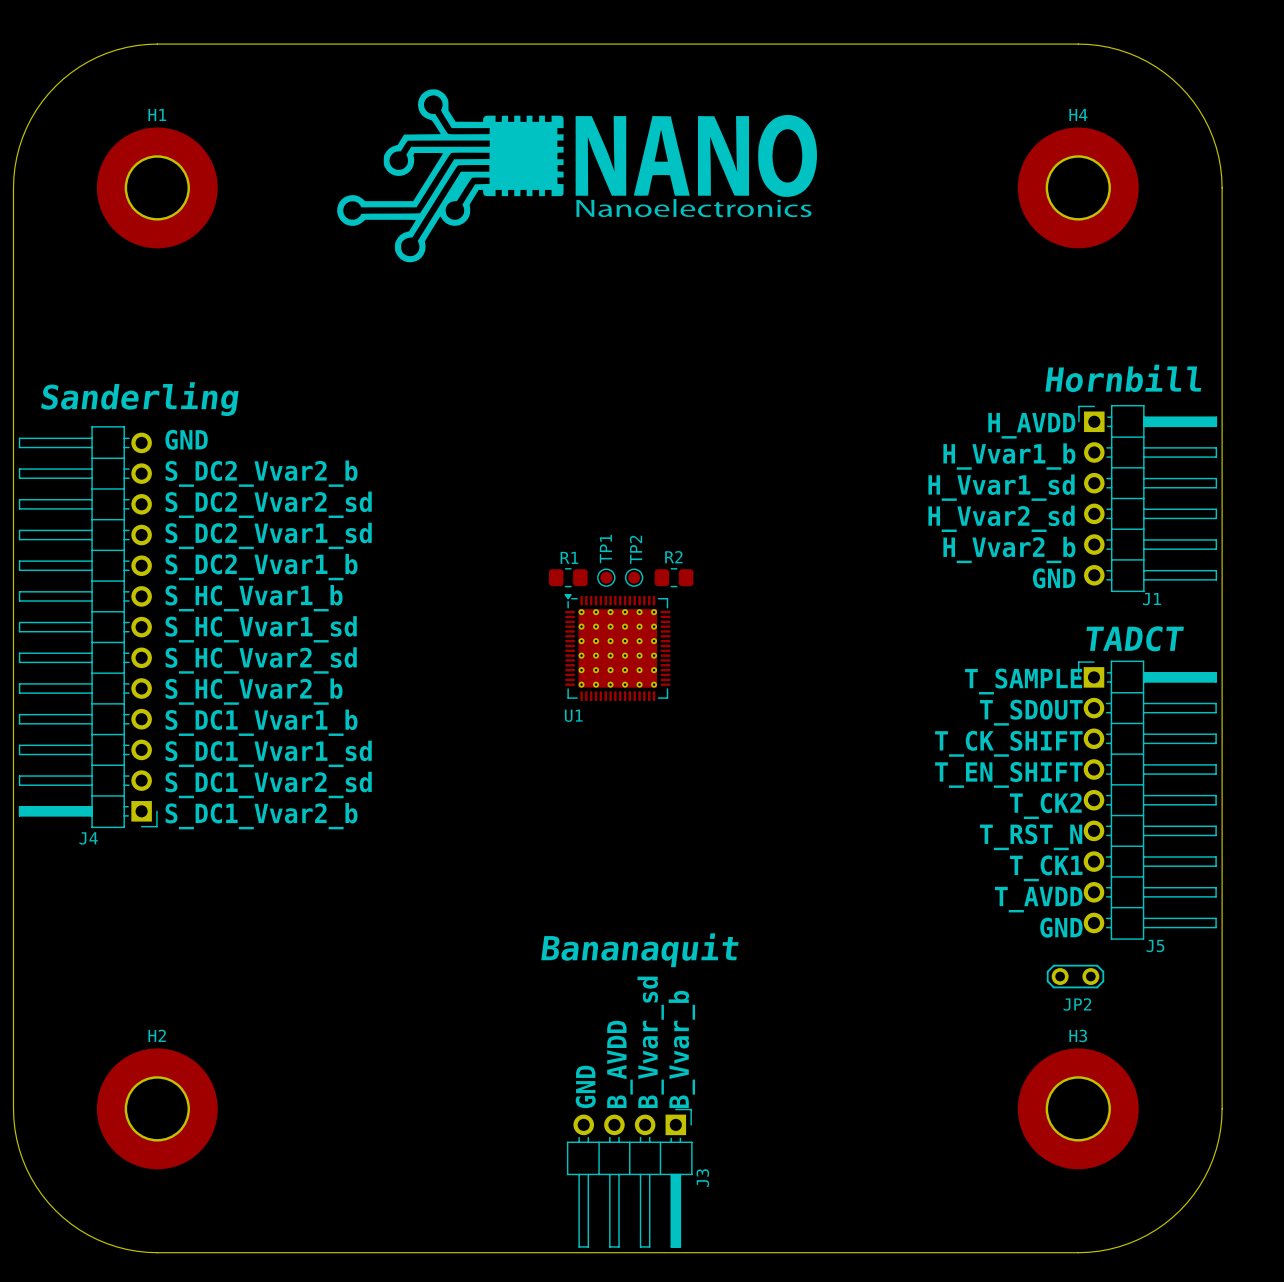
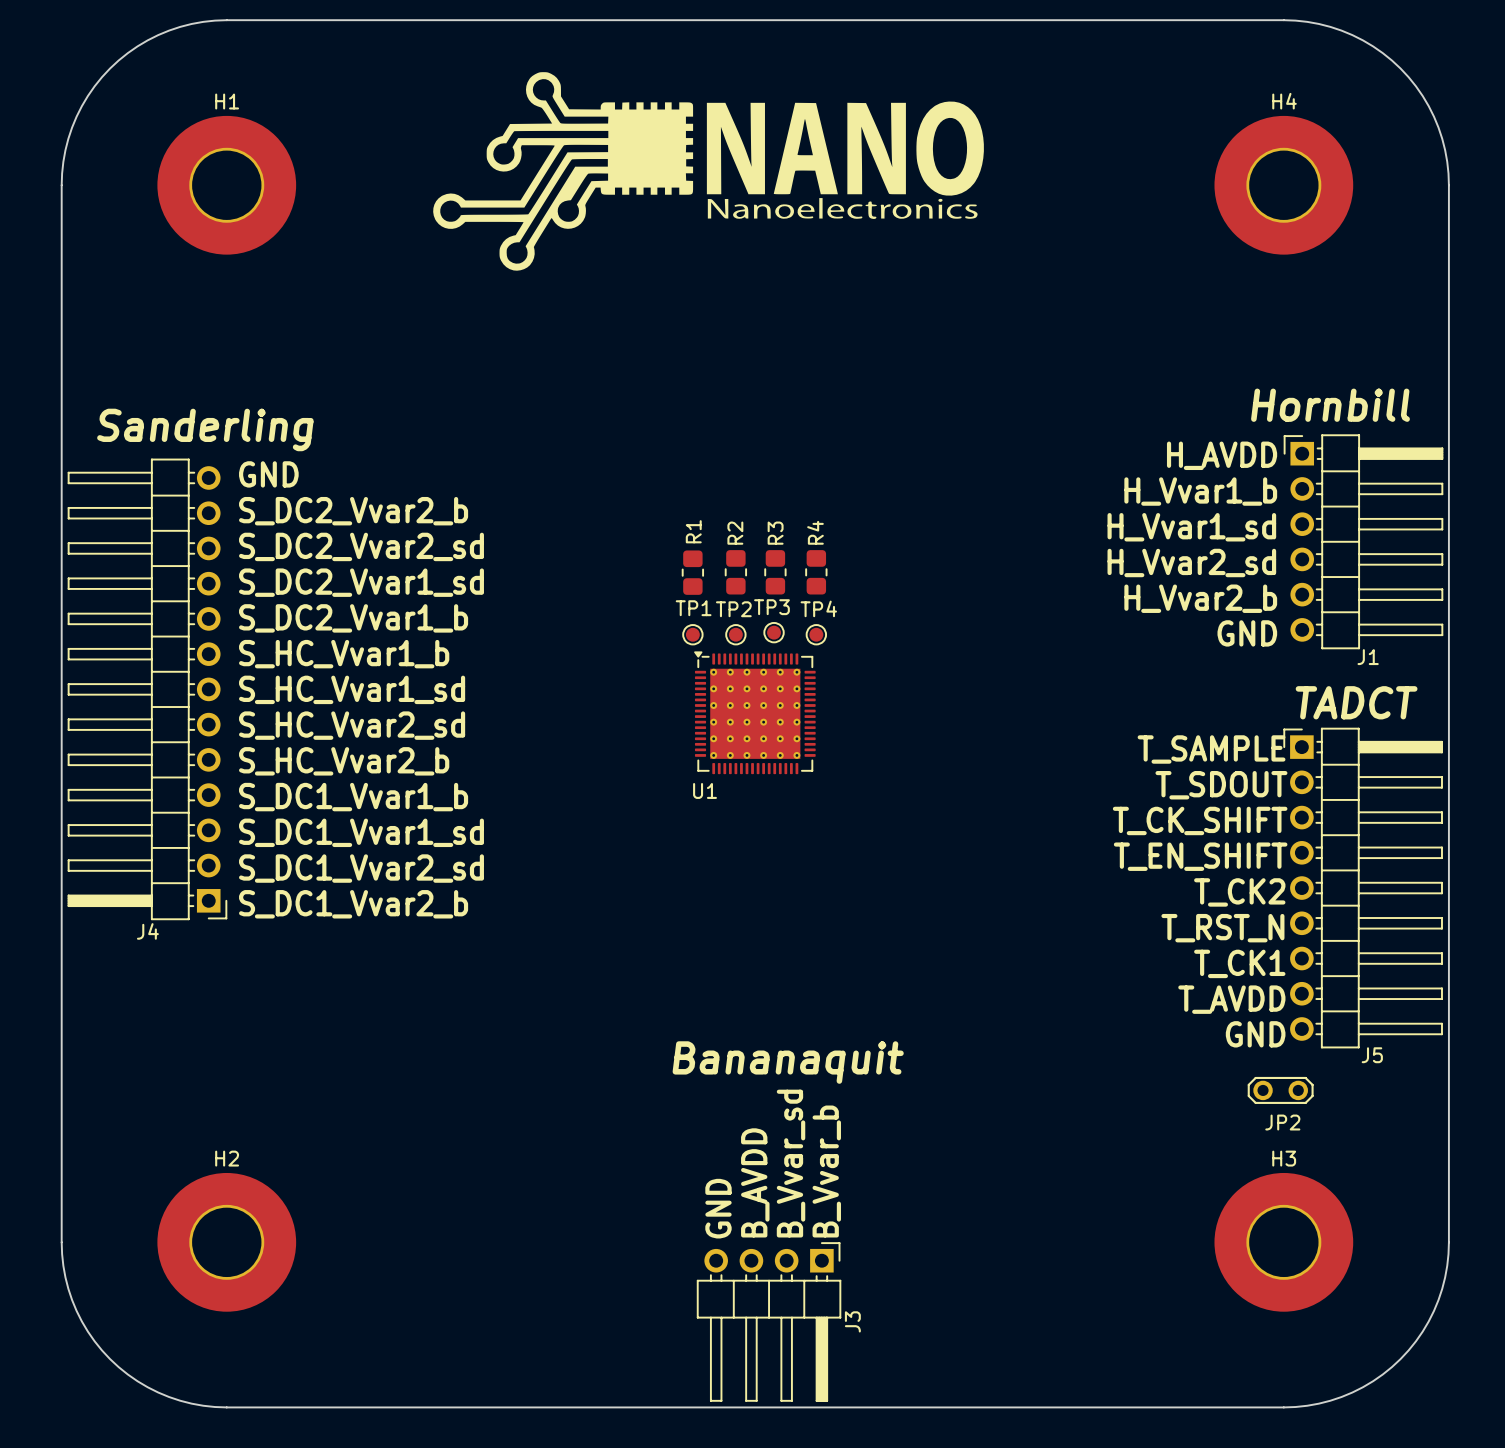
R3: none -> (775, 572)
R4: none -> (816, 572)
TP1 name rotation: 0° (605, 549) -> 90° clockwise (693, 608)
TP2 name: TP2 (635, 549) -> TP3 (771, 607)
R1 rotation: 0° (568, 577) -> 90° clockwise (692, 572)
R1 position: (568, 577) -> (692, 572)
TP1 position: (606, 577) -> (692, 634)
R2 rotation: 0° (674, 577) -> 90° clockwise (735, 572)
R2 position: (674, 577) -> (735, 572)
TP2: none -> (735, 634)
TP4: none -> (816, 634)

